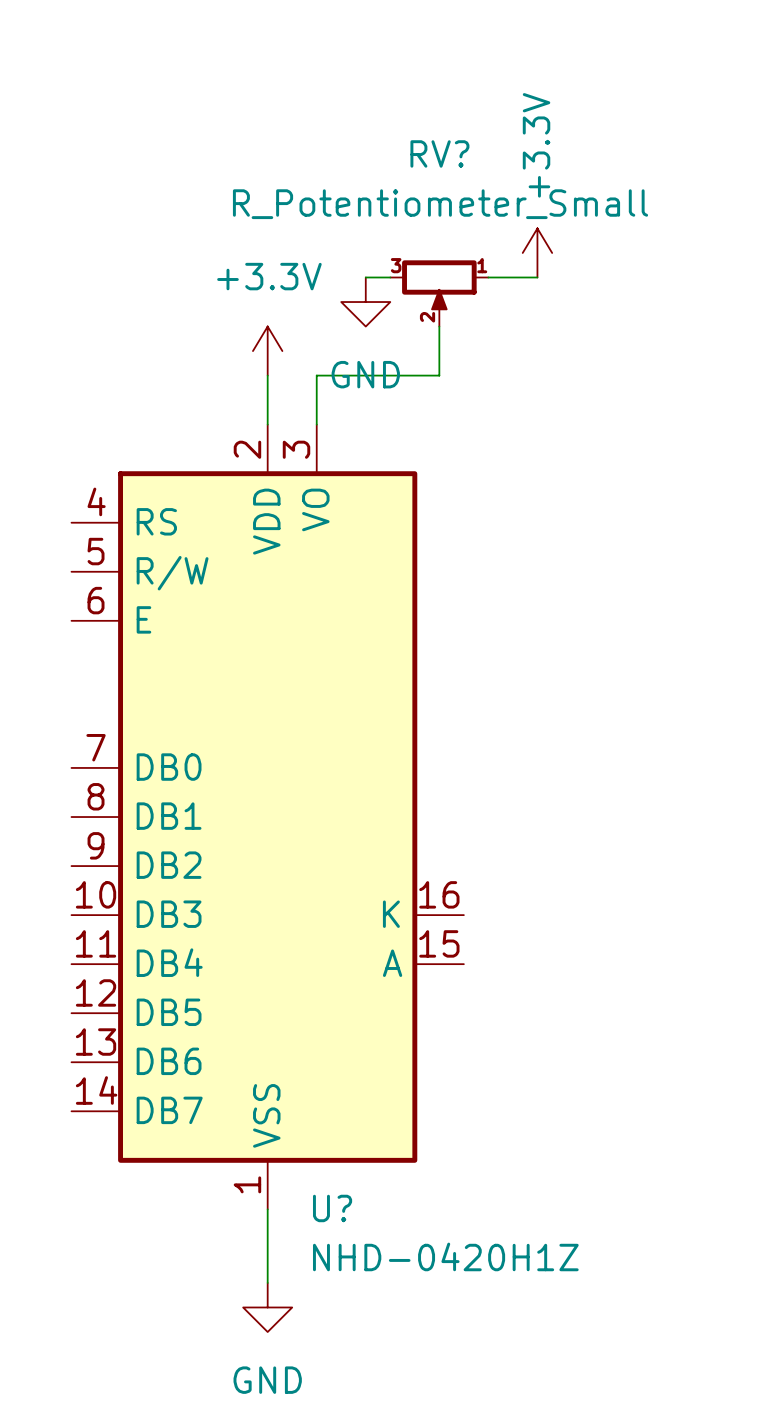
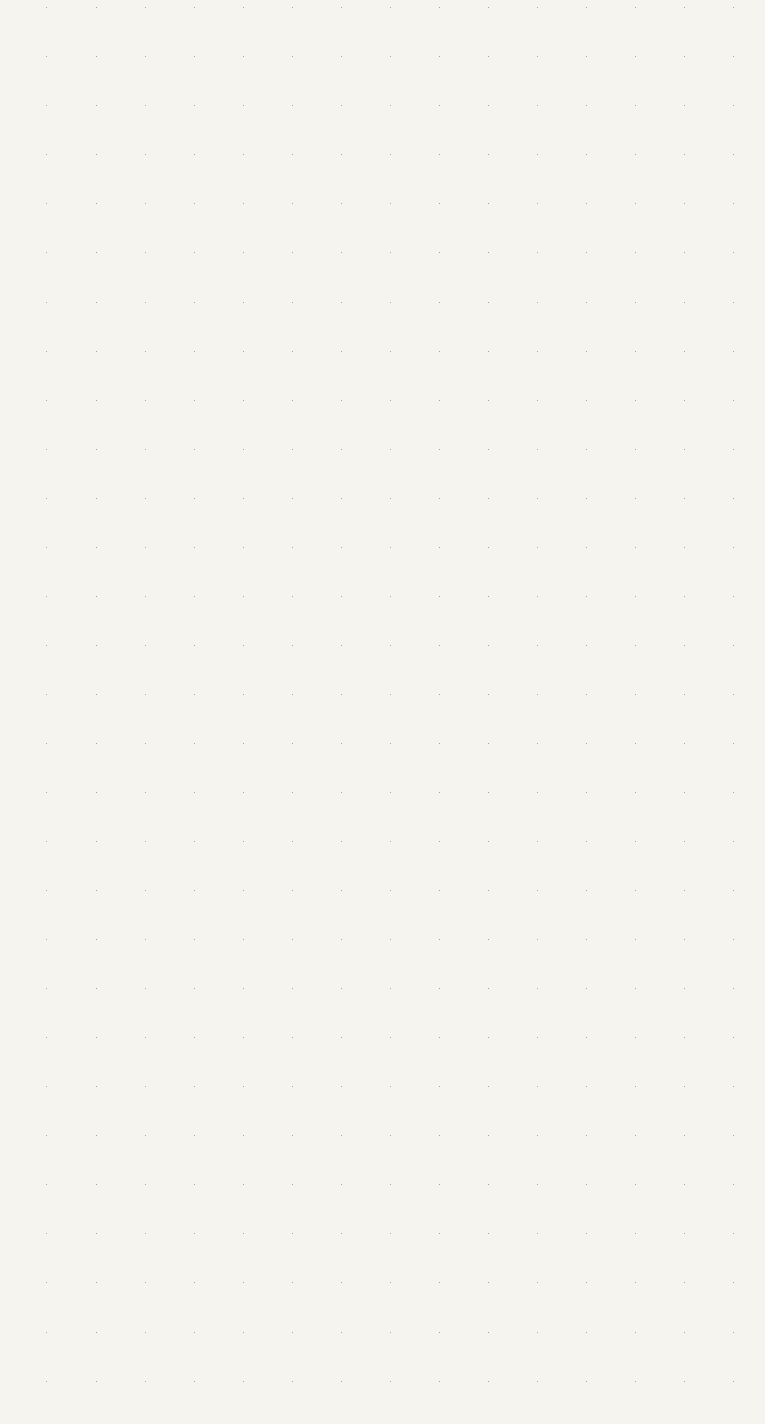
power symbol: +3.3V (537, 252) -> none
wire: (365, 277) (390, 277) -> none
wire: (488, 277) (537, 277) -> none
RV?: R_Potentiometer_Small (439, 293) -> none
power symbol: GND (365, 302) -> none
wire: (439, 326) (439, 375) (316, 375) (316, 424) -> none
power symbol: +3.3V (267, 351) -> none
wire: (267, 375) (267, 424) -> none
U?: NHD-0420H1Z (267, 817) -> none
wire: (267, 1209) (267, 1282) -> none
power symbol: GND (267, 1307) -> none

